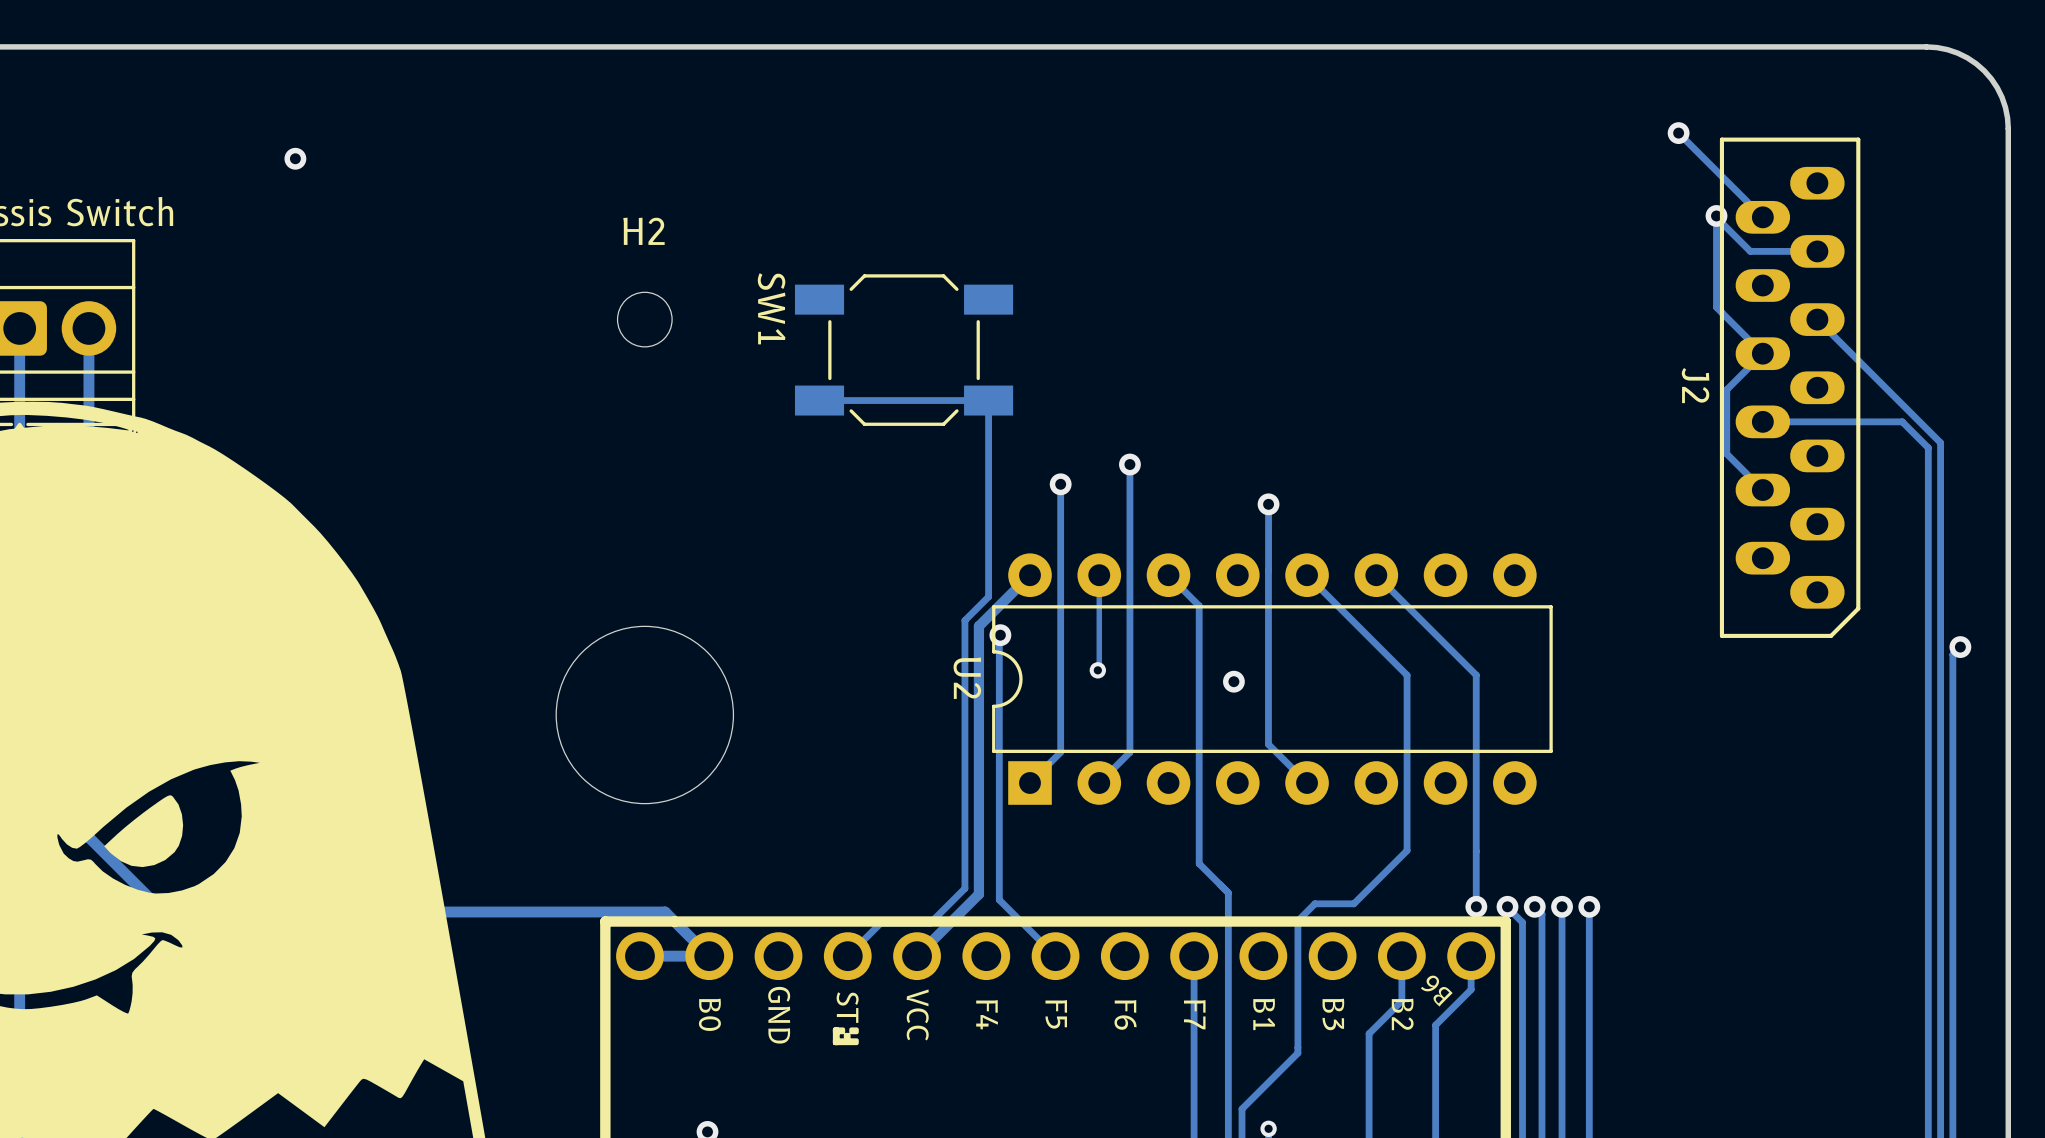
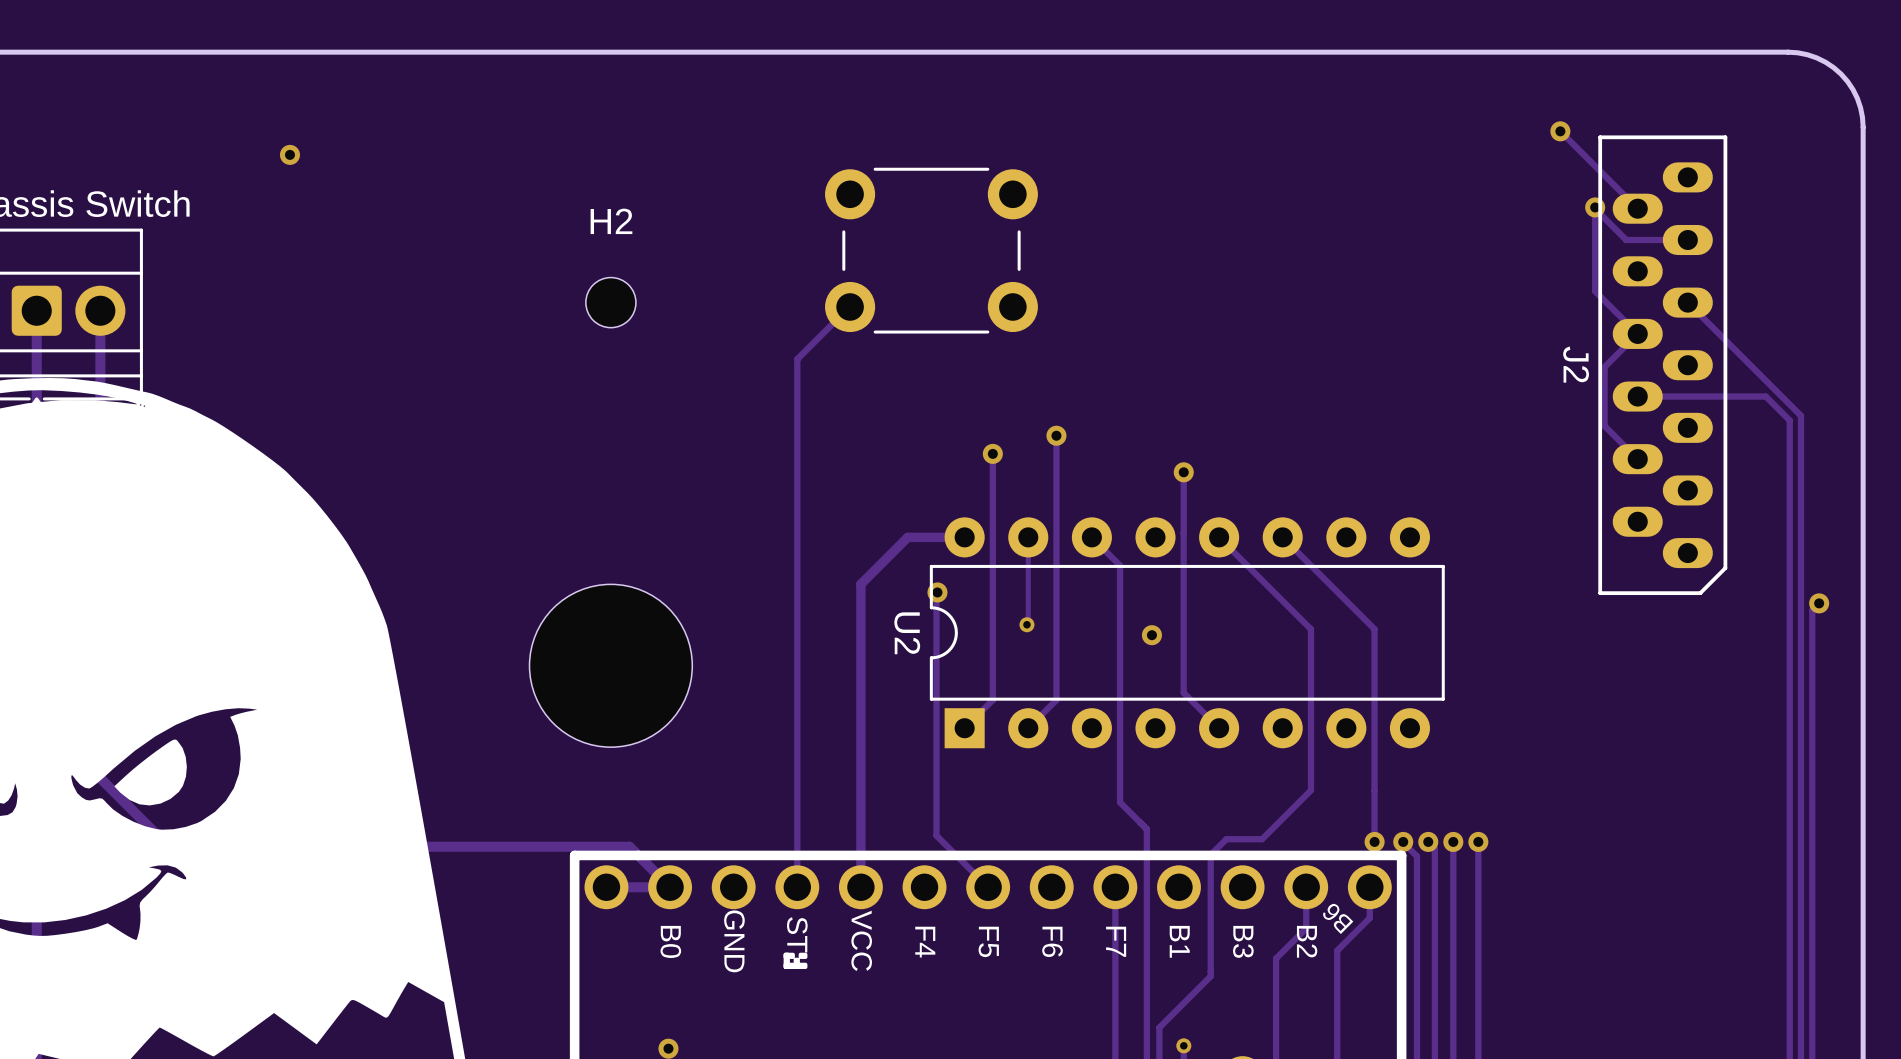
part: none -> (931, 250)
SW1: (904, 350) -> none
track: (819, 400) (988, 400) (988, 596) (964, 620) (964, 888) (930, 923) (880, 923) (847, 956) -> (848, 307) (797, 359) (797, 887)
track: (1029, 575) (978, 626) (978, 894) (917, 956) -> (964, 537) (907, 537) (860, 584) (860, 887)

